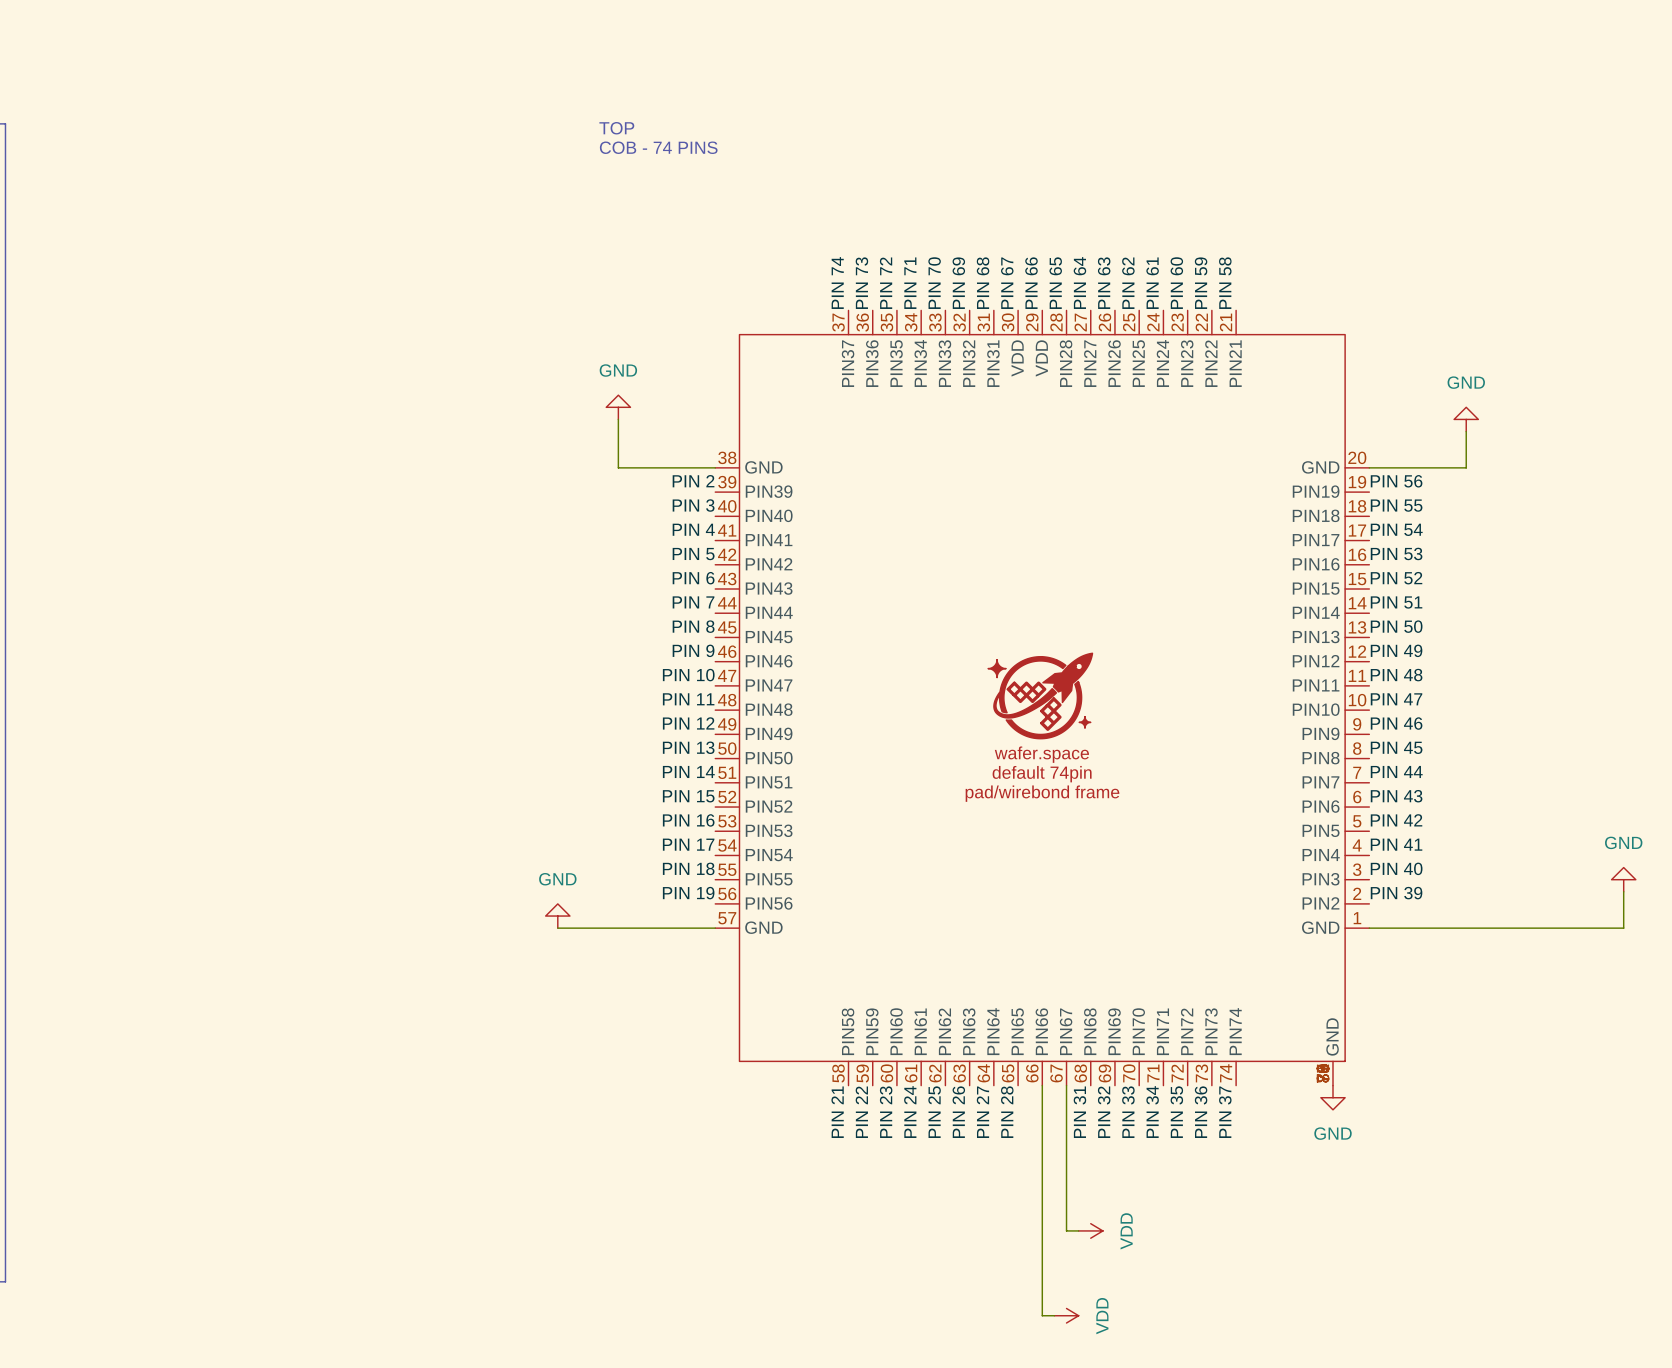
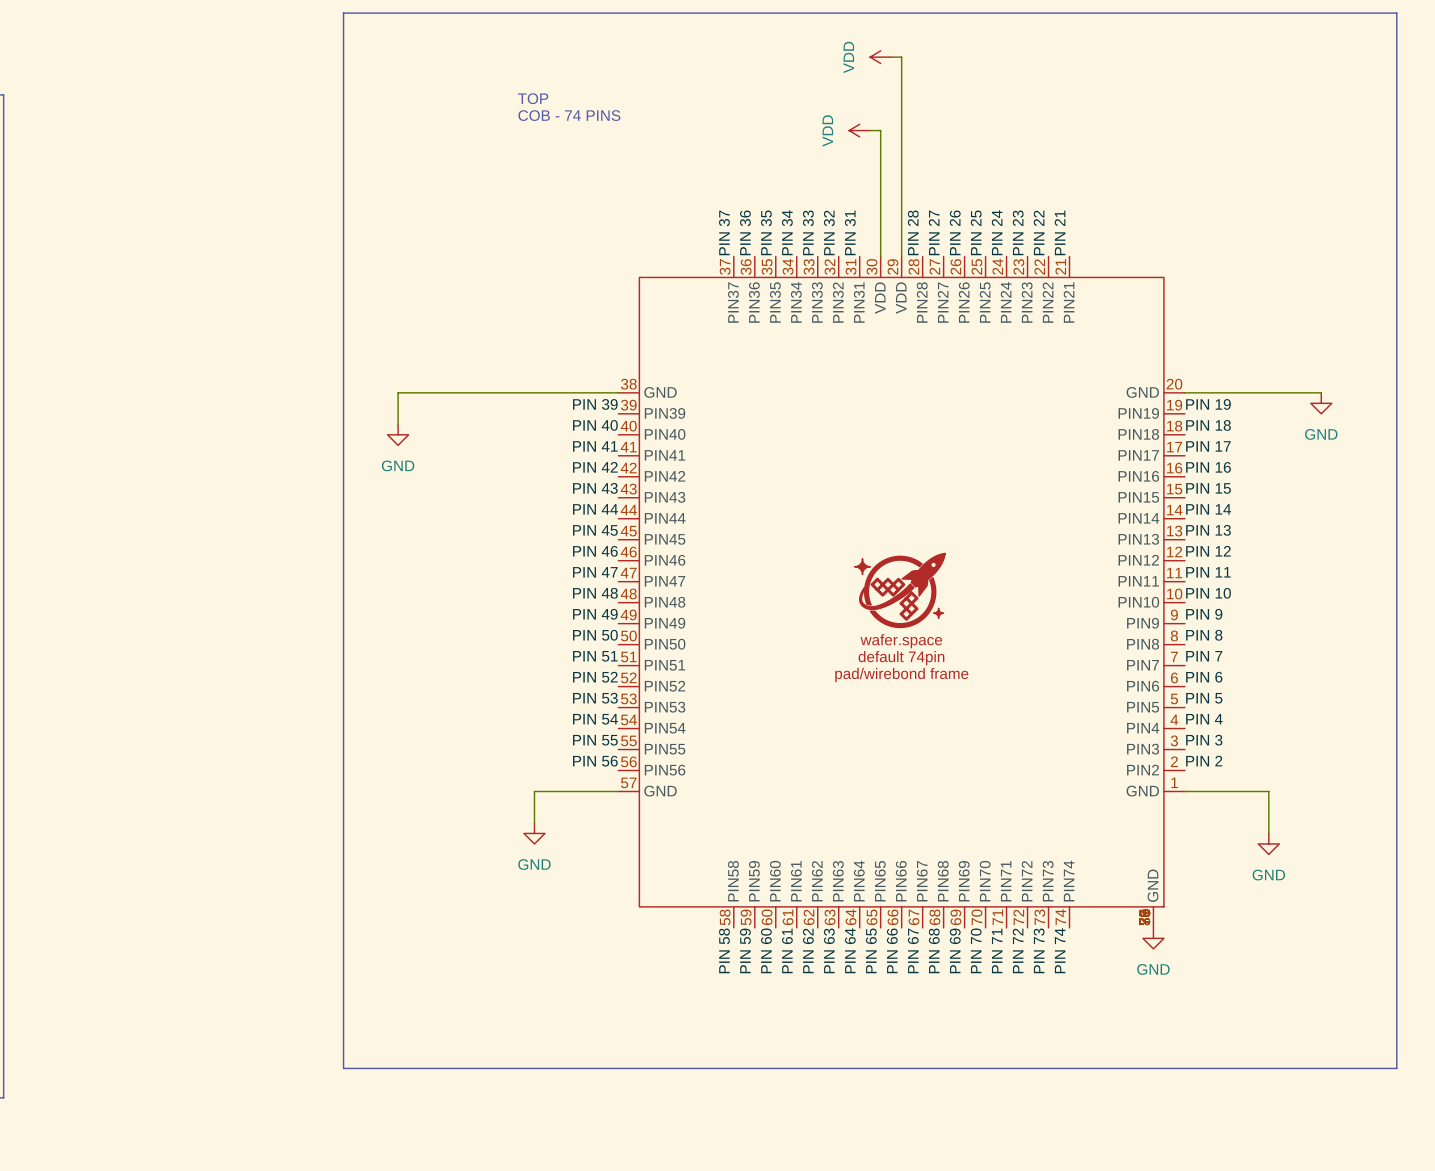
line: none -> (343, 13) (1396, 13) (1396, 1068) (343, 1068) (343, 13)
power symbol: none -> VDD (880, 57)
wire: none -> (891, 57) (901, 57) (901, 256)
power symbol: none -> VDD (859, 130)
wire: none -> (870, 130) (880, 130) (880, 256)
label: PIN 74 (837, 283) -> PIN 37 (724, 232)
label: PIN 73 (861, 283) -> PIN 36 (745, 232)
label: PIN 72 (886, 283) -> PIN 35 (766, 232)
label: PIN 71 (910, 283) -> PIN 34 (787, 232)
label: PIN 70 (934, 283) -> PIN 33 (808, 232)
label: PIN 69 (958, 283) -> PIN 32 (829, 232)
label: PIN 68 (983, 283) -> PIN 31 (850, 232)
label: PIN 67 (1007, 283) -> none
label: PIN 66 (1031, 283) -> none
label: PIN 65 (1055, 283) -> PIN 28 (913, 232)
label: PIN 64 (1079, 283) -> PIN 27 (934, 232)
label: PIN 63 (1104, 283) -> PIN 26 (955, 232)
label: PIN 62 (1128, 283) -> PIN 25 (976, 232)
label: PIN 61 (1152, 283) -> PIN 24 (997, 232)
label: PIN 60 (1176, 283) -> PIN 23 (1018, 232)
label: PIN 59 (1201, 283) -> PIN 22 (1039, 232)
label: PIN 58 (1225, 283) -> PIN 21 (1060, 232)
power symbol rotation: 0° (618, 407) -> 180° (398, 434)
power symbol position: GND (618, 407) -> GND (398, 434)
wire: (618, 419) (618, 467) -> (398, 424) (398, 392) (534, 392)
power symbol rotation: 0° (1466, 419) -> 180° (1321, 403)
power symbol position: GND (1466, 419) -> GND (1321, 403)
wire: (1466, 431) (1466, 467) -> (1321, 392) (1268, 392)
label: PIN 2 (693, 481) -> PIN 39 (595, 404)
label: PIN 56 (1396, 481) -> PIN 19 (1208, 404)
label: PIN 3 (693, 505) -> PIN 40 (595, 425)
label: PIN 55 (1396, 505) -> PIN 18 (1208, 425)
label: PIN 4 (693, 529) -> PIN 41 (595, 446)
label: PIN 54 (1396, 529) -> PIN 17 (1208, 446)
label: PIN 53 (1396, 553) -> PIN 16 (1208, 467)
label: PIN 5 (693, 554) -> PIN 42 (595, 467)
label: PIN 6 (693, 578) -> PIN 43 (595, 488)
label: PIN 52 (1396, 578) -> PIN 15 (1208, 488)
label: PIN 7 (693, 602) -> PIN 44 (595, 509)
label: PIN 51 (1396, 602) -> PIN 14 (1208, 509)
label: PIN 8 (693, 626) -> PIN 45 (595, 530)
label: PIN 50 (1396, 626) -> PIN 13 (1208, 530)
label: PIN 9 (693, 650) -> PIN 46 (595, 551)
label: PIN 49 (1396, 650) -> PIN 12 (1208, 551)
label: PIN 10 (688, 675) -> PIN 47 (595, 572)
label: PIN 48 (1396, 675) -> PIN 11 (1208, 572)
label: PIN 11 (688, 699) -> PIN 48 (595, 593)
label: PIN 47 (1396, 699) -> PIN 10 (1208, 593)
label: PIN 12 (688, 723) -> PIN 49 (595, 614)
label: PIN 46 (1396, 723) -> PIN 9 (1204, 614)
label: PIN 13 (688, 747) -> PIN 50 (595, 635)
label: PIN 45 (1396, 747) -> PIN 8 (1204, 635)
label: PIN 14 (688, 771) -> PIN 51 (595, 656)
label: PIN 44 (1396, 771) -> PIN 7 (1204, 656)
label: PIN 15 (688, 796) -> PIN 52 (595, 677)
label: PIN 43 (1396, 796) -> PIN 6 (1204, 677)
label: PIN 16 (688, 820) -> PIN 53 (595, 698)
label: PIN 42 (1396, 820) -> PIN 5 (1204, 698)
label: PIN 17 (688, 844) -> PIN 54 (595, 719)
label: PIN 41 (1396, 844) -> PIN 4 (1204, 719)
label: PIN 18 (688, 868) -> PIN 55 (595, 740)
label: PIN 40 (1396, 868) -> PIN 3 (1204, 740)
power symbol rotation: 0° (1623, 879) -> 180° (1268, 843)
power symbol position: GND (1623, 879) -> GND (1268, 843)
wire: (1623, 891) (1623, 928) (1466, 928) -> (1268, 833) (1268, 791)
label: PIN 19 (688, 893) -> PIN 56 (595, 761)
label: PIN 39 (1396, 893) -> PIN 2 (1204, 761)
power symbol rotation: 0° (557, 916) -> 180° (534, 833)
power symbol position: GND (557, 916) -> GND (534, 833)
wire: (557, 928) (618, 928) -> (534, 822) (534, 791)
wire: (1042, 1085) (1042, 1315) (1054, 1315) -> none
wire: (1066, 1085) (1066, 1230) (1078, 1230) -> none
label: PIN 21 (837, 1112) -> PIN 58 (724, 950)
label: PIN 22 (861, 1112) -> PIN 59 (745, 950)
label: PIN 23 (886, 1112) -> PIN 60 (766, 950)
label: PIN 24 (910, 1112) -> PIN 61 (787, 950)
label: PIN 25 (934, 1112) -> PIN 62 (808, 950)
label: PIN 26 (958, 1112) -> PIN 63 (829, 950)
label: PIN 27 (982, 1112) -> PIN 64 (850, 950)
label: PIN 28 (1007, 1112) -> PIN 65 (871, 950)
label: none -> PIN 66 (892, 950)
label: none -> PIN 67 (913, 950)
label: PIN 31 (1079, 1112) -> PIN 68 (934, 950)
label: PIN 32 (1104, 1112) -> PIN 69 (955, 950)
label: PIN 33 (1128, 1112) -> PIN 70 (976, 950)
label: PIN 34 (1152, 1112) -> PIN 71 (997, 950)
label: PIN 35 (1176, 1112) -> PIN 72 (1018, 950)
label: PIN 36 (1201, 1112) -> PIN 73 (1039, 950)
label: PIN 37 (1225, 1112) -> PIN 74 (1060, 950)
power symbol: VDD (1090, 1230) -> none
power symbol: VDD (1066, 1315) -> none

